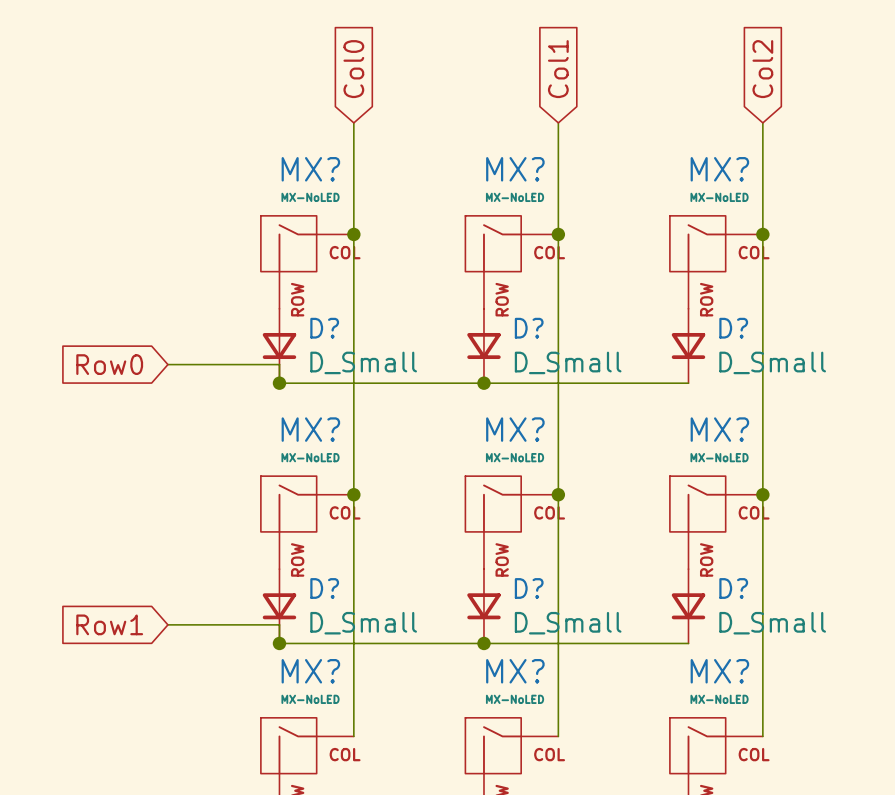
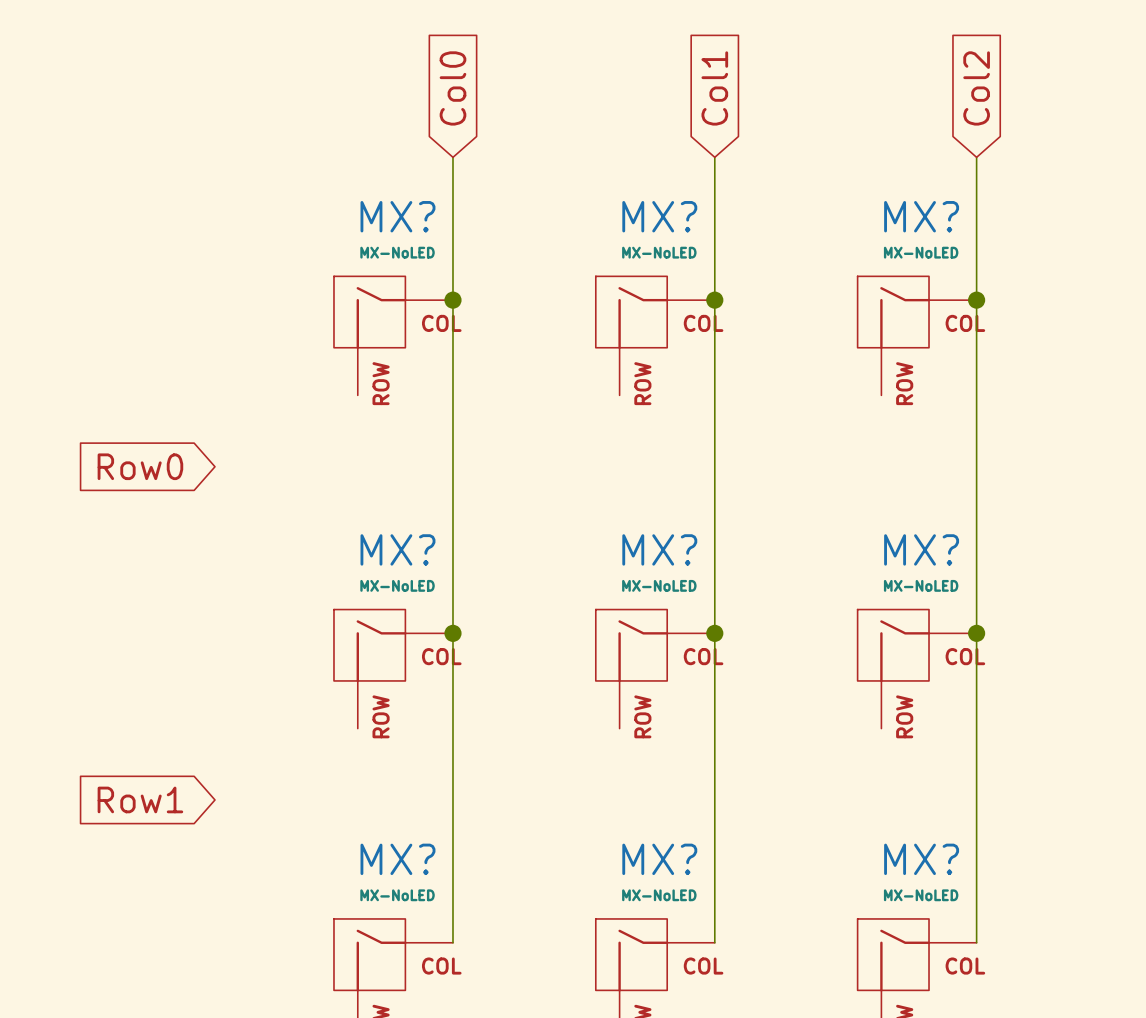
D?: D_Small (279, 346) -> none
D?: D_Small (483, 346) -> none
D?: D_Small (688, 346) -> none
wire: (167, 364) (279, 364) (279, 383) (688, 383) -> none
junction: (279, 383) -> none
junction: (483, 383) -> none
D?: D_Small (279, 606) -> none
D?: D_Small (483, 606) -> none
D?: D_Small (688, 606) -> none
wire: (167, 624) (279, 624) (279, 643) (688, 643) -> none
junction: (279, 643) -> none
junction: (483, 643) -> none

